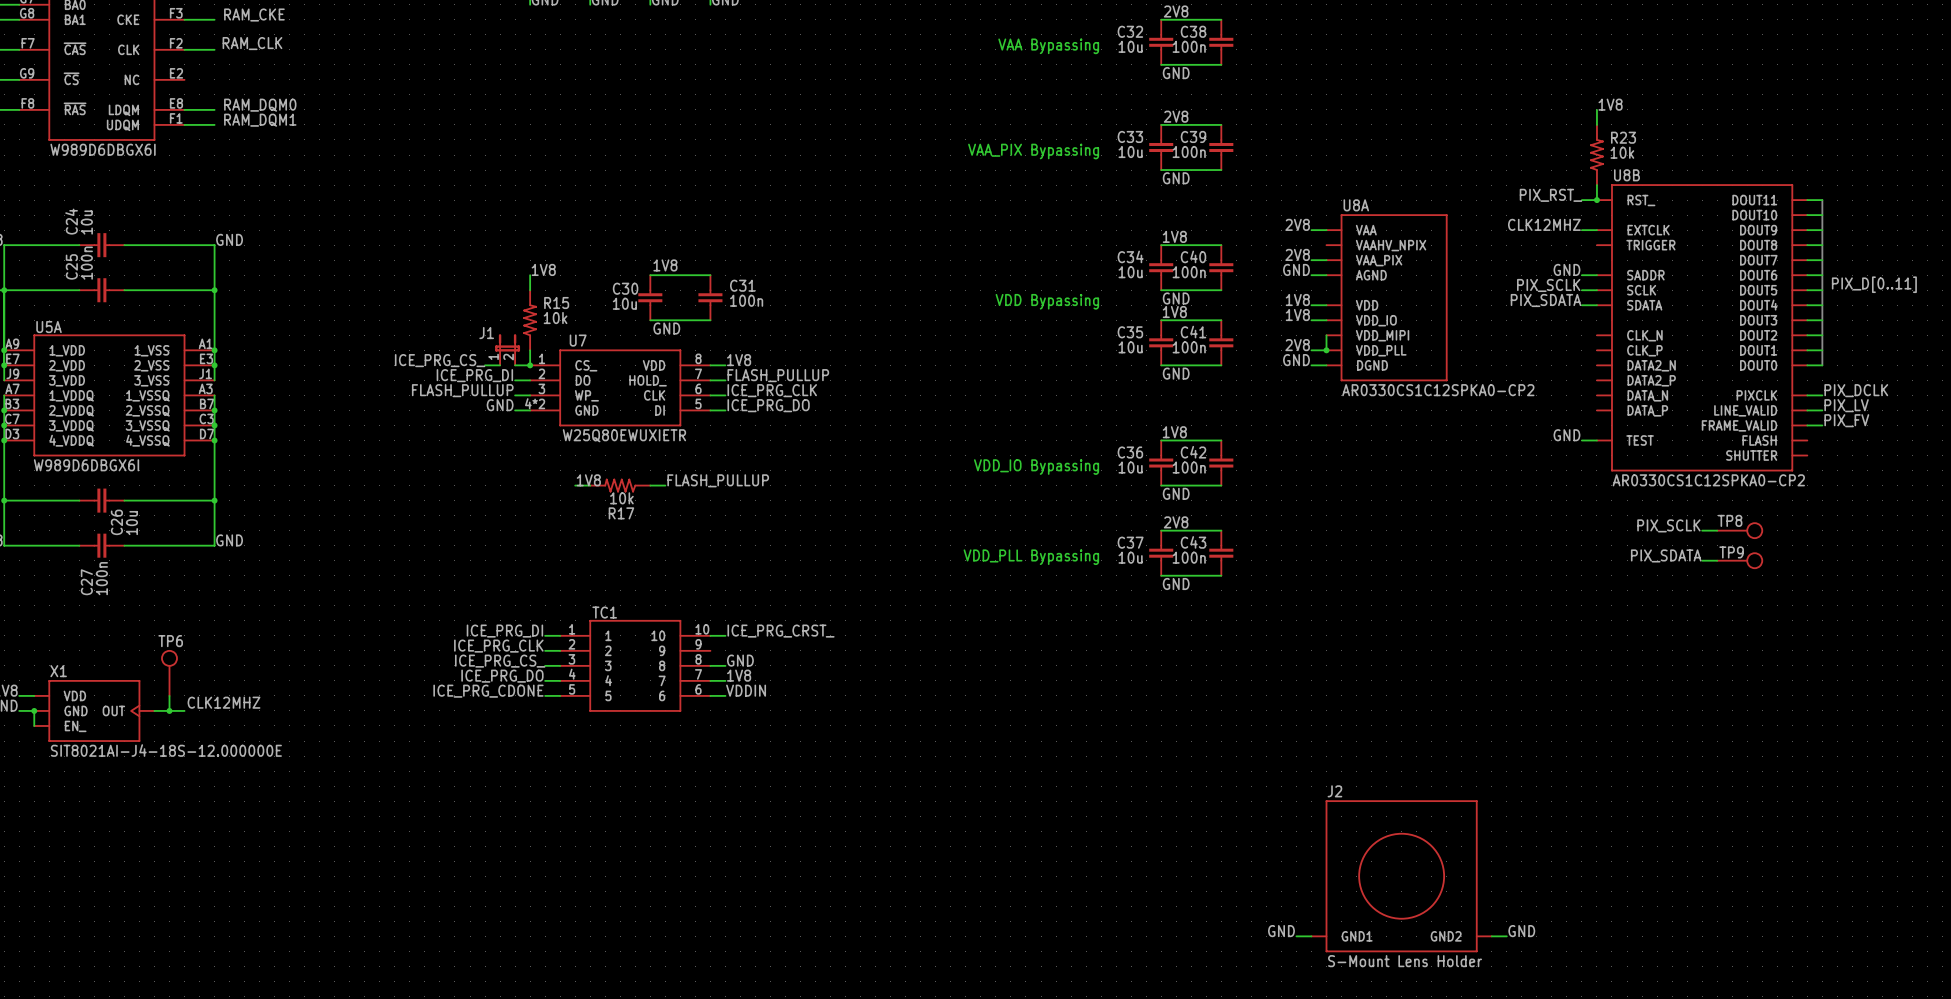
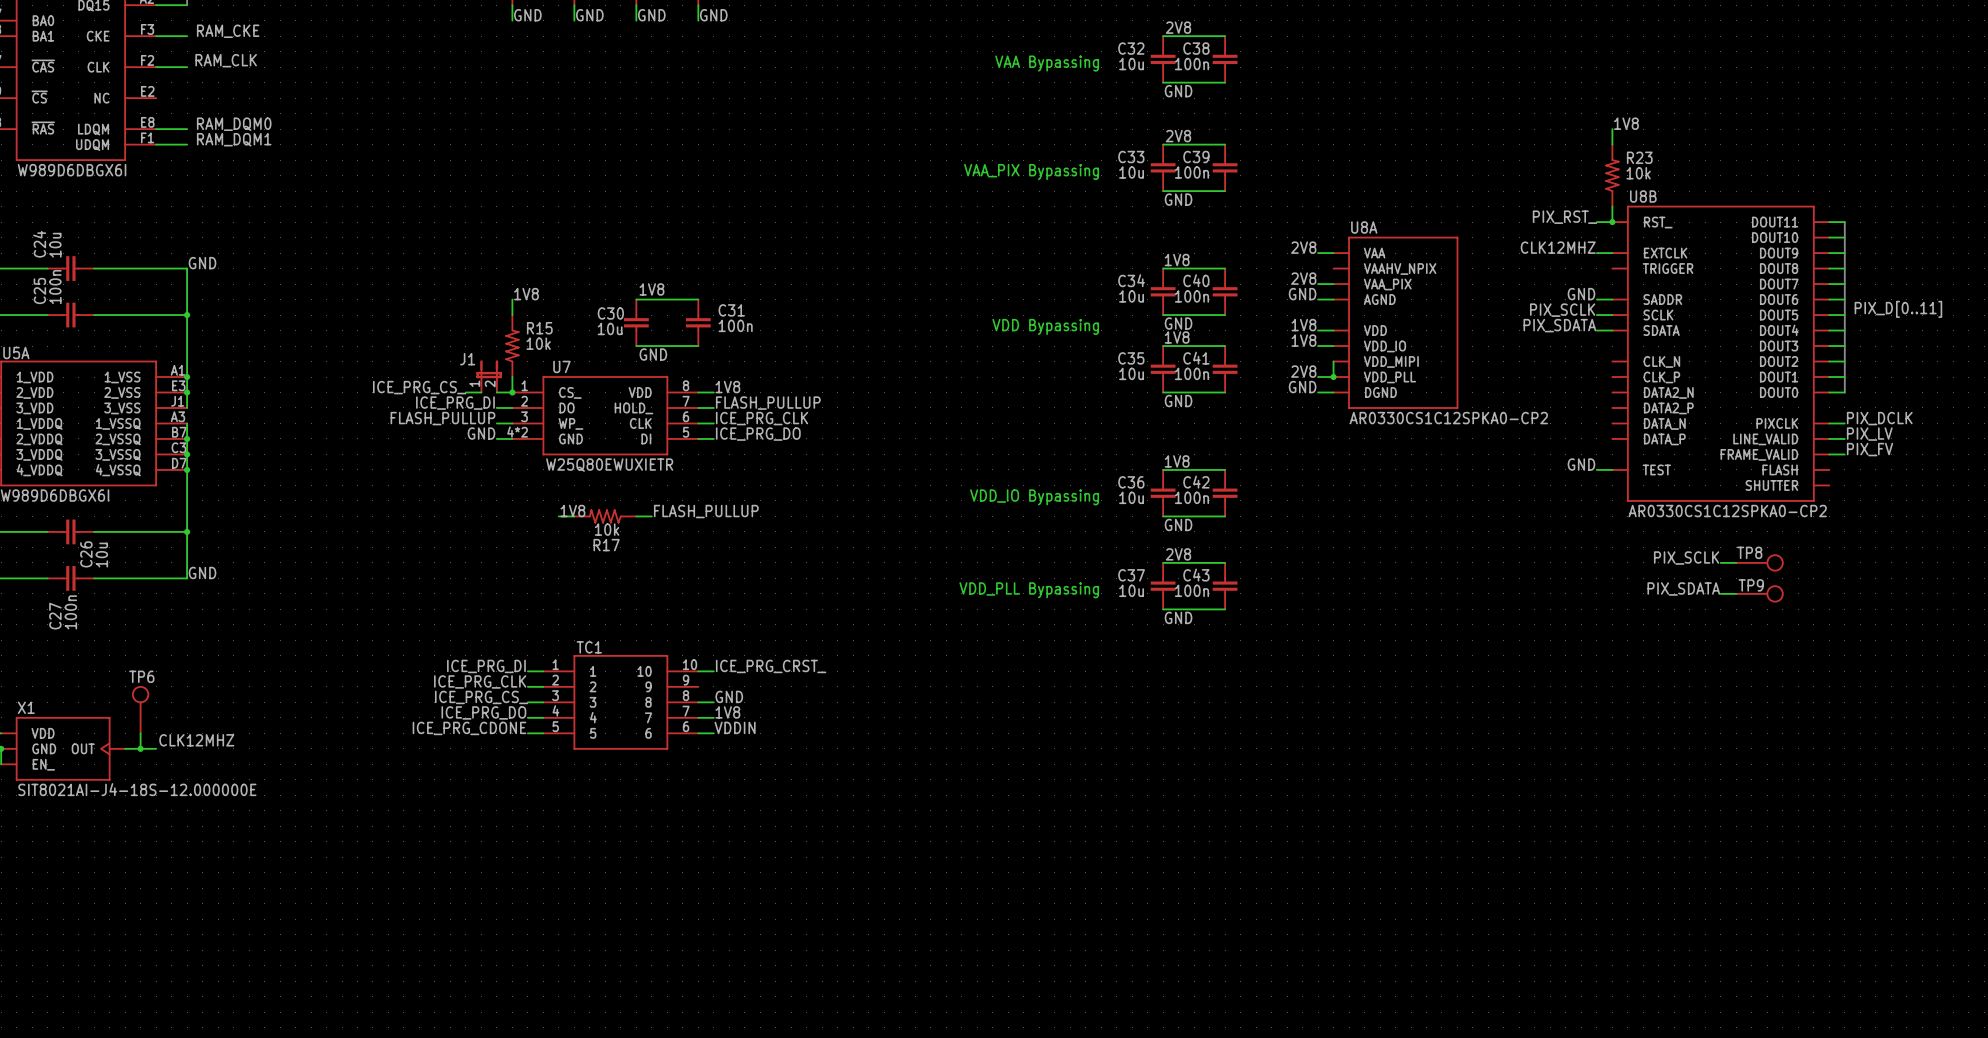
J2: (1401, 876) -> none
label: GND (1281, 931) -> none
label: GND (1521, 931) -> none
wire: (1296, 936) (1311, 936) -> none
wire: (1491, 936) (1506, 936) -> none

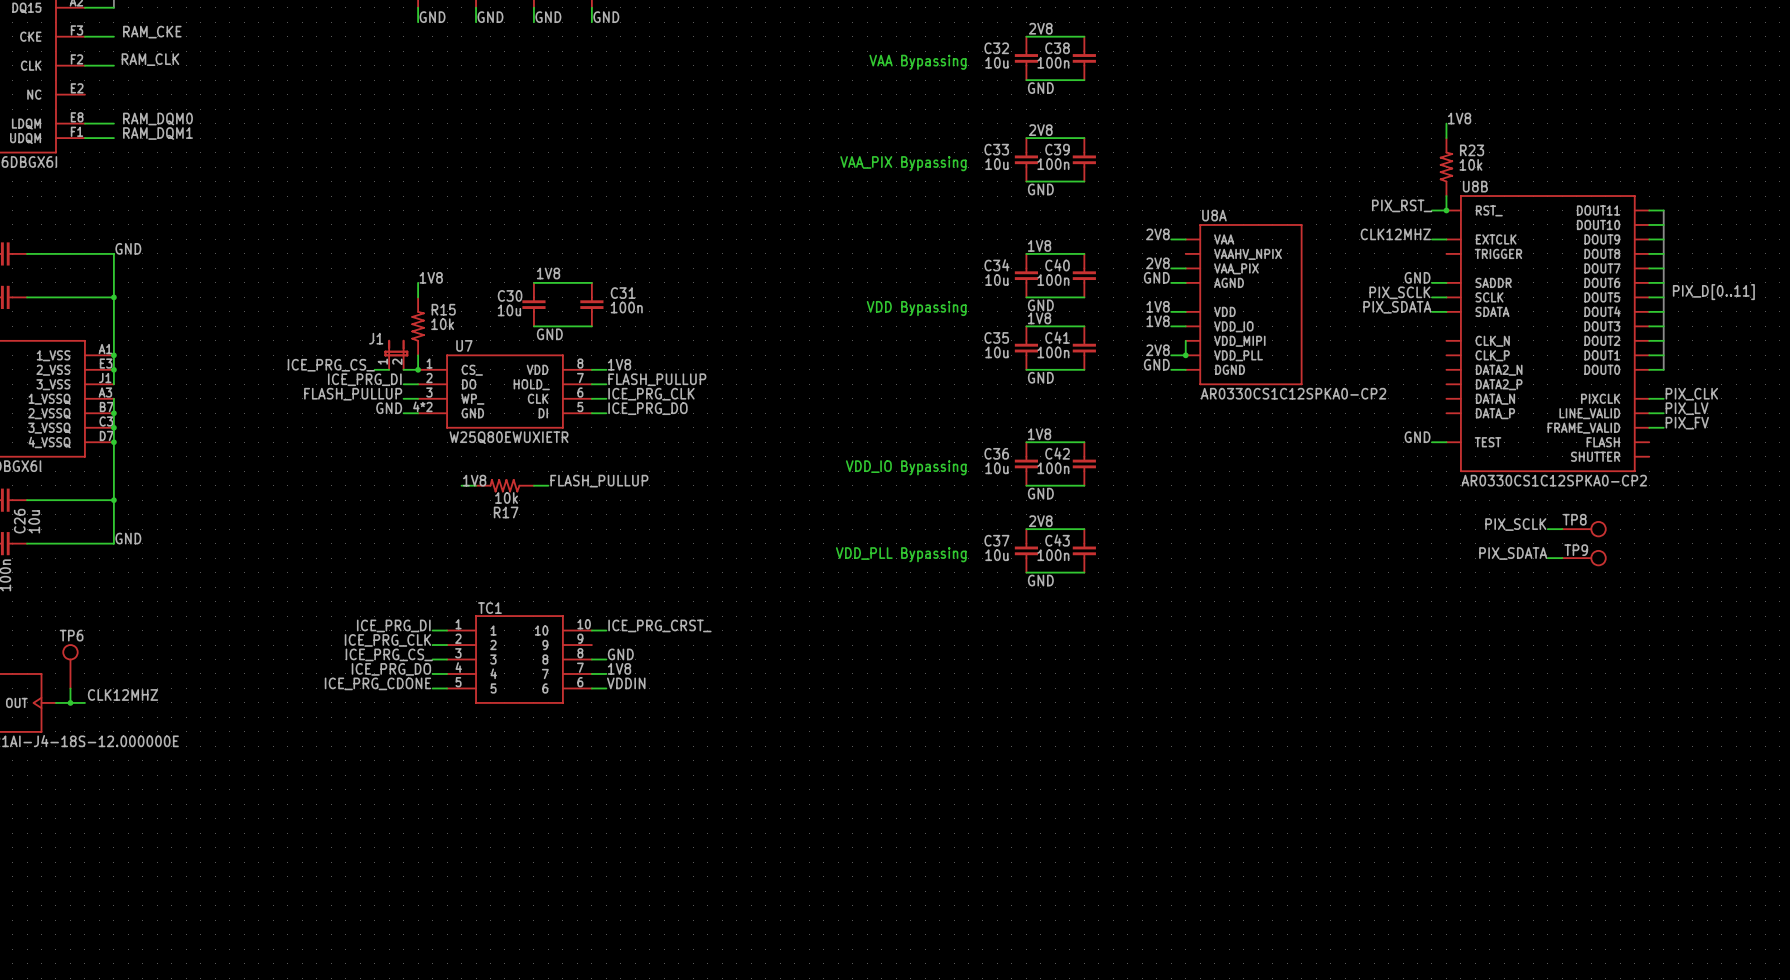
label: PIX_DCLK (1879, 418) -> PIX_CLK (1691, 394)

